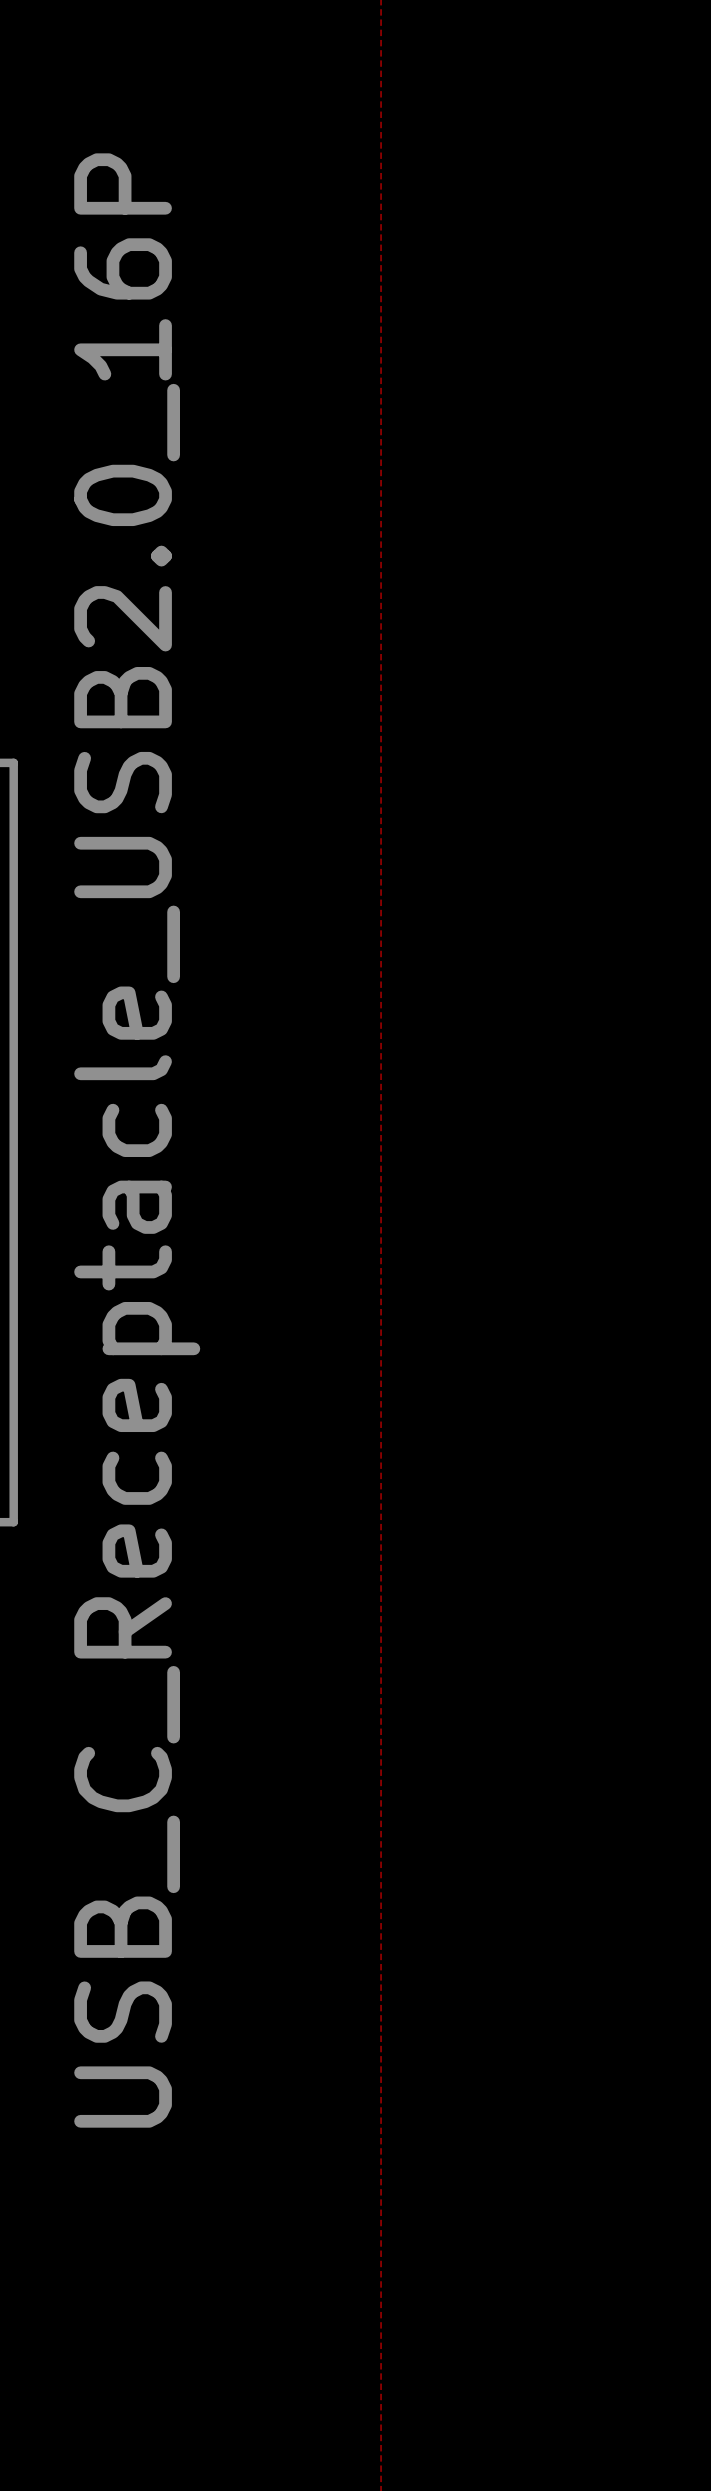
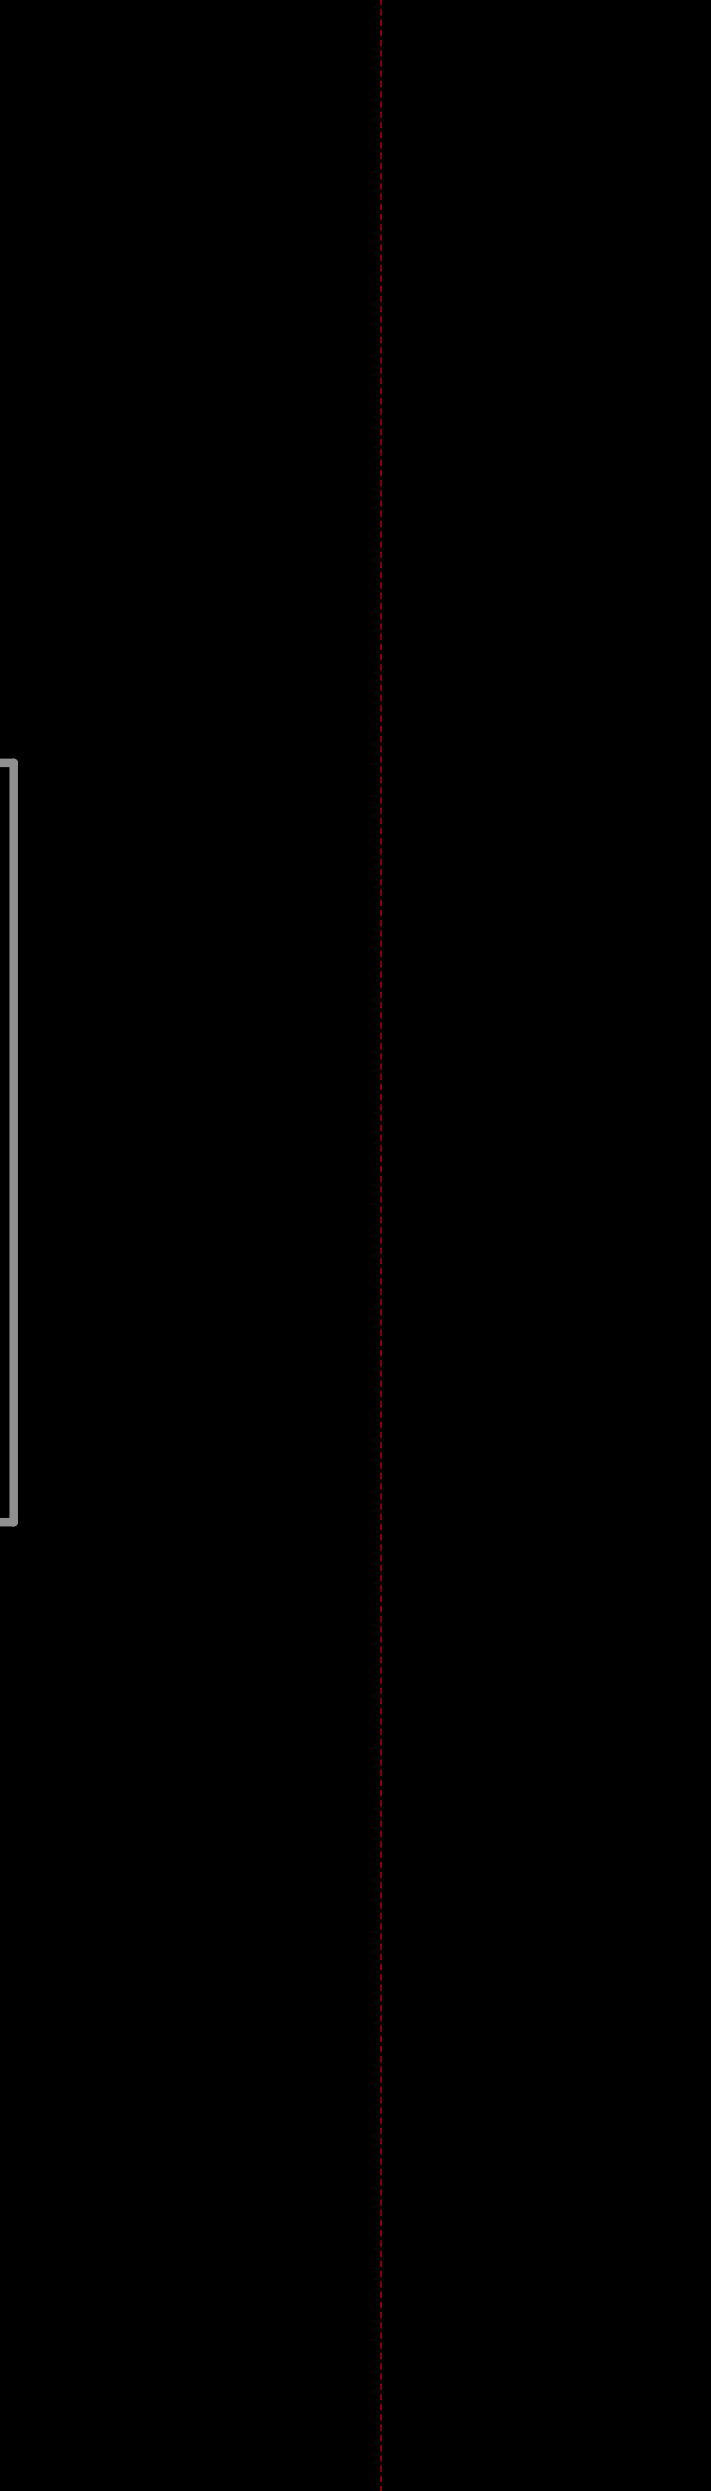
part value: USB_C_Receptacle_USB2.0_16P (137, 1140) -> none

